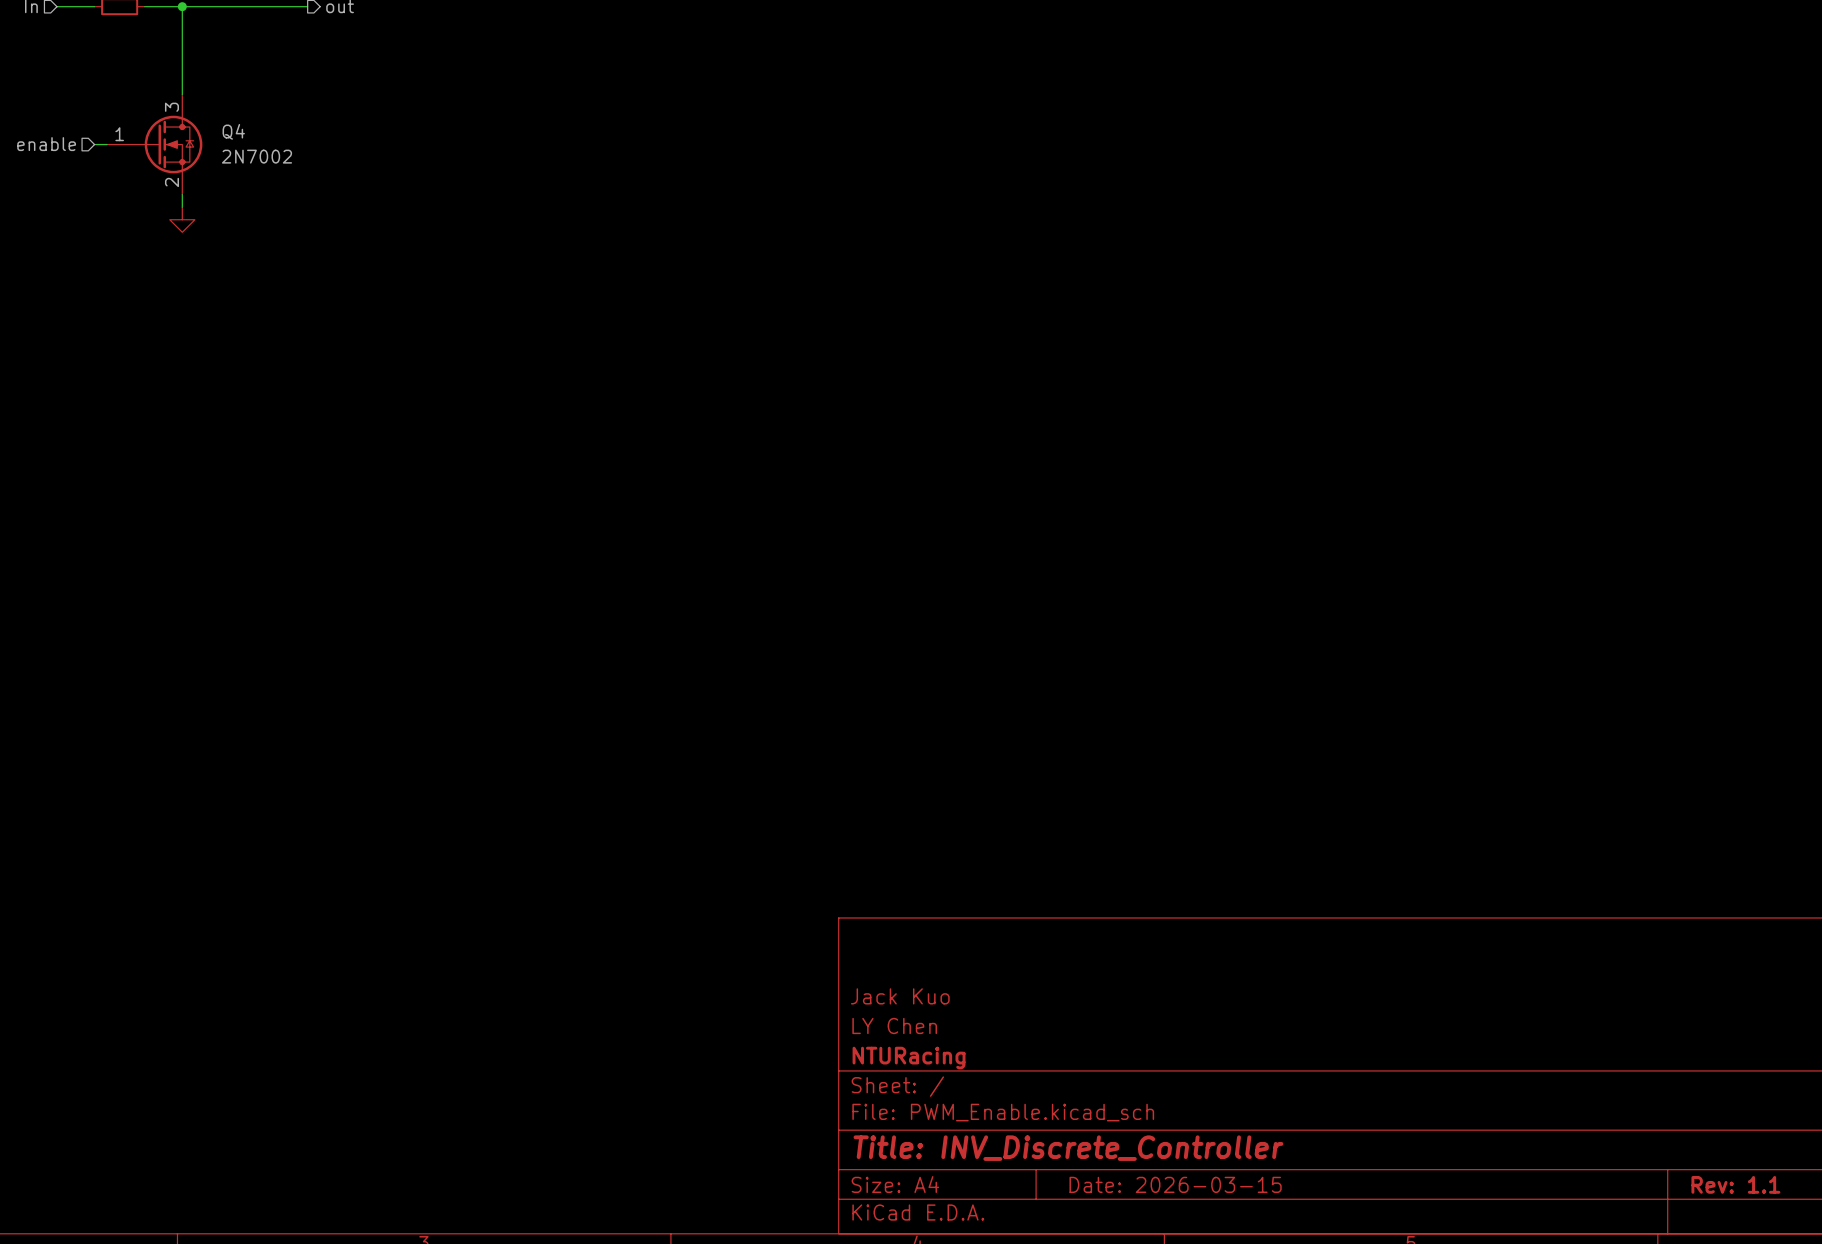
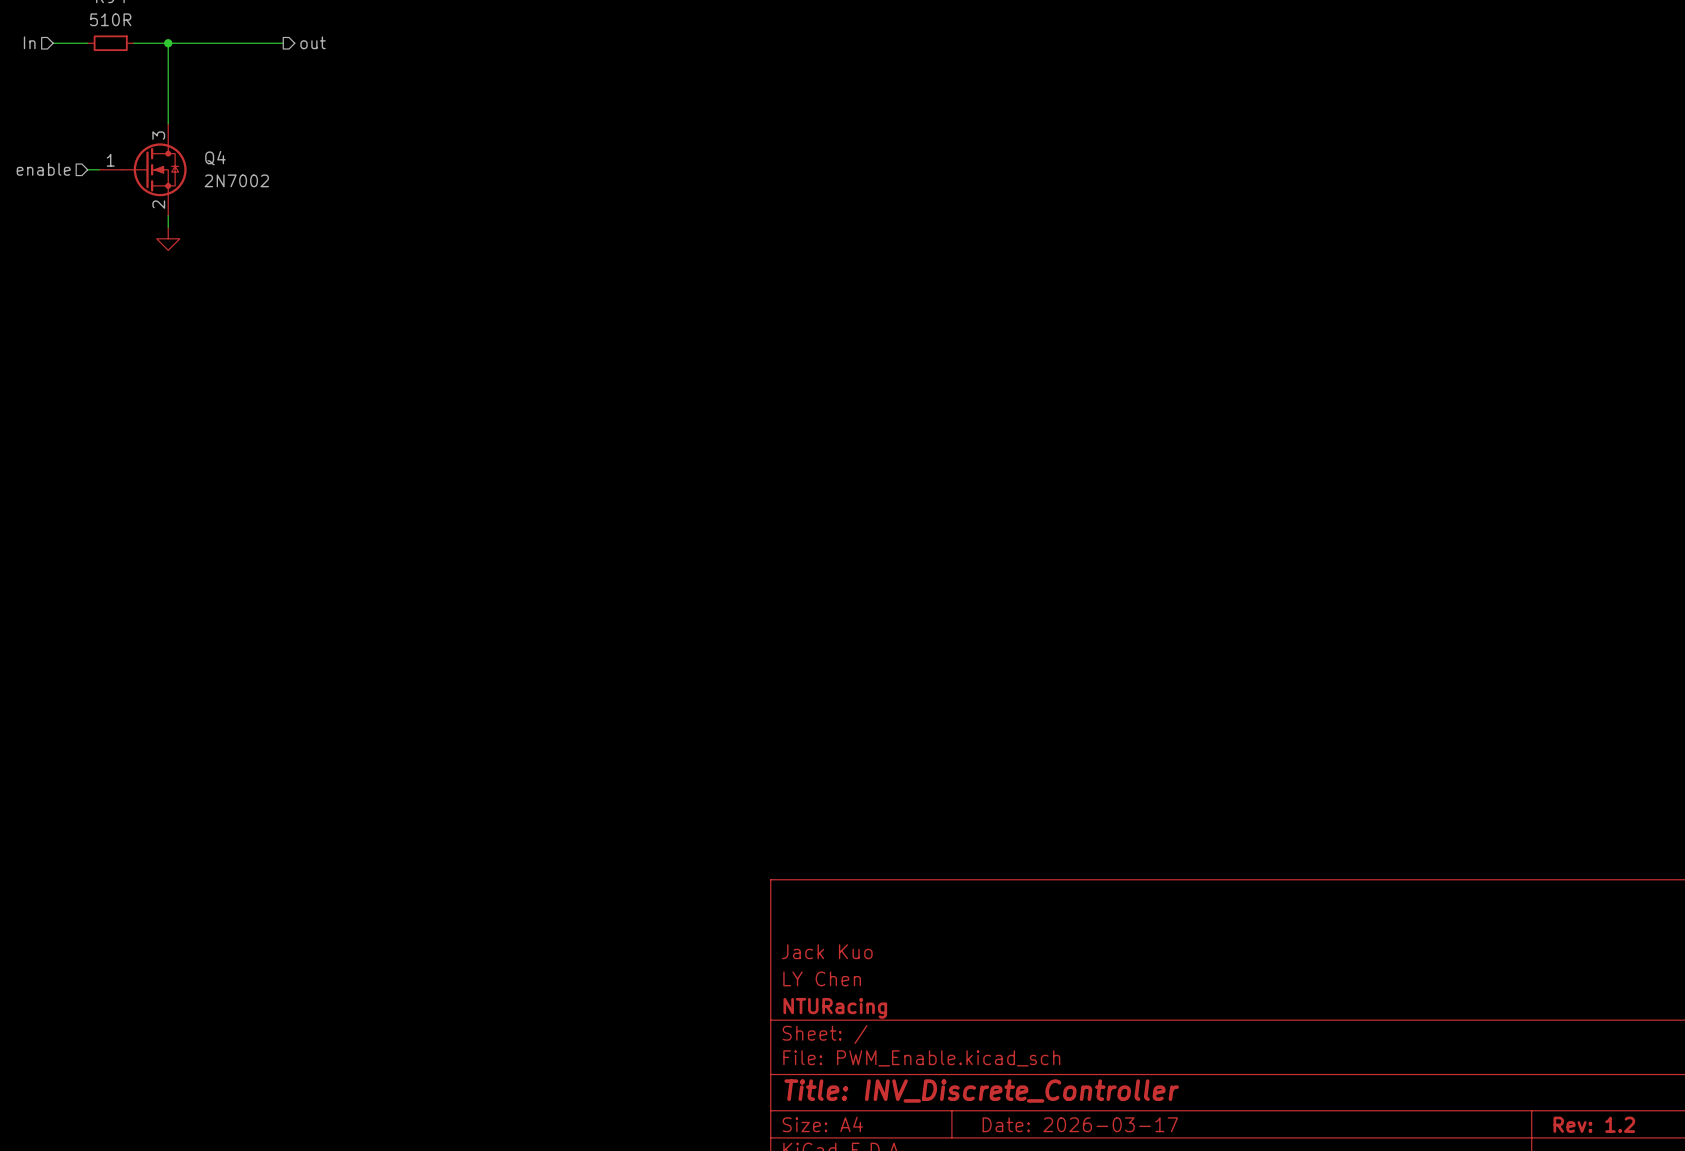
title block: Date: 2026-03-15 (1175, 1184) -> Date: 2026-03-17 (1080, 1124)
title block: Rev: 1.1 (1735, 1184) -> Rev: 1.2 (1594, 1124)

